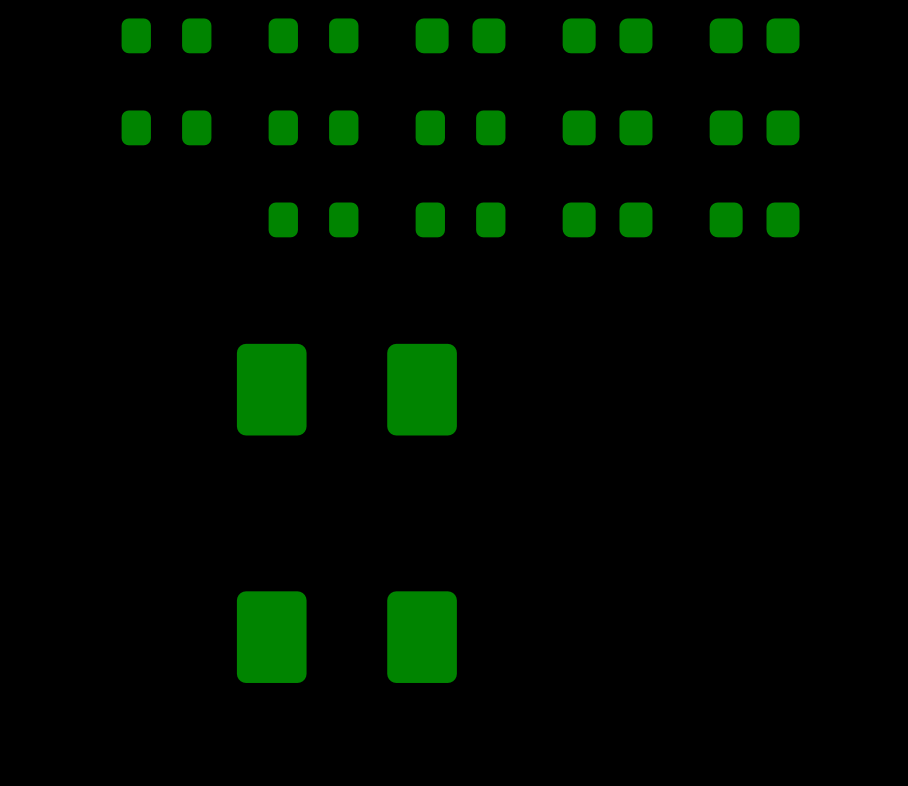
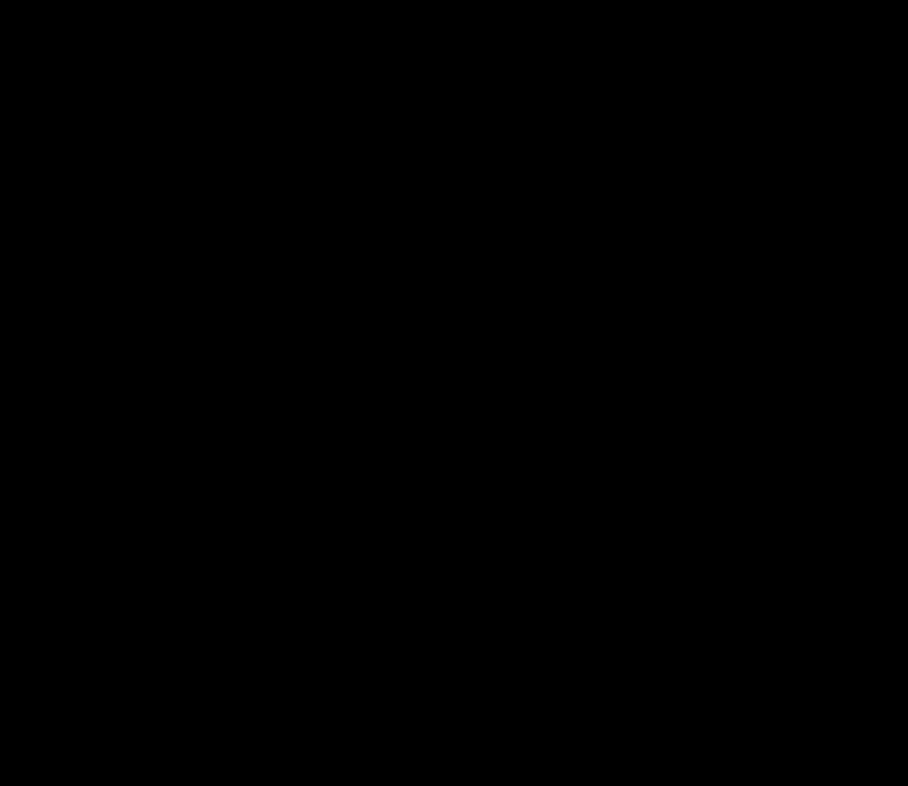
part: (166, 35) -> none
part: (313, 35) -> none
part: (460, 35) -> none
part: (607, 35) -> none
part: (754, 35) -> none
part: (166, 127) -> none
part: (313, 127) -> none
part: (460, 127) -> none
part: (607, 127) -> none
part: (754, 127) -> none
part: (313, 219) -> none
part: (460, 219) -> none
part: (607, 219) -> none
part: (754, 219) -> none
part: (346, 389) -> none
part: (346, 637) -> none

